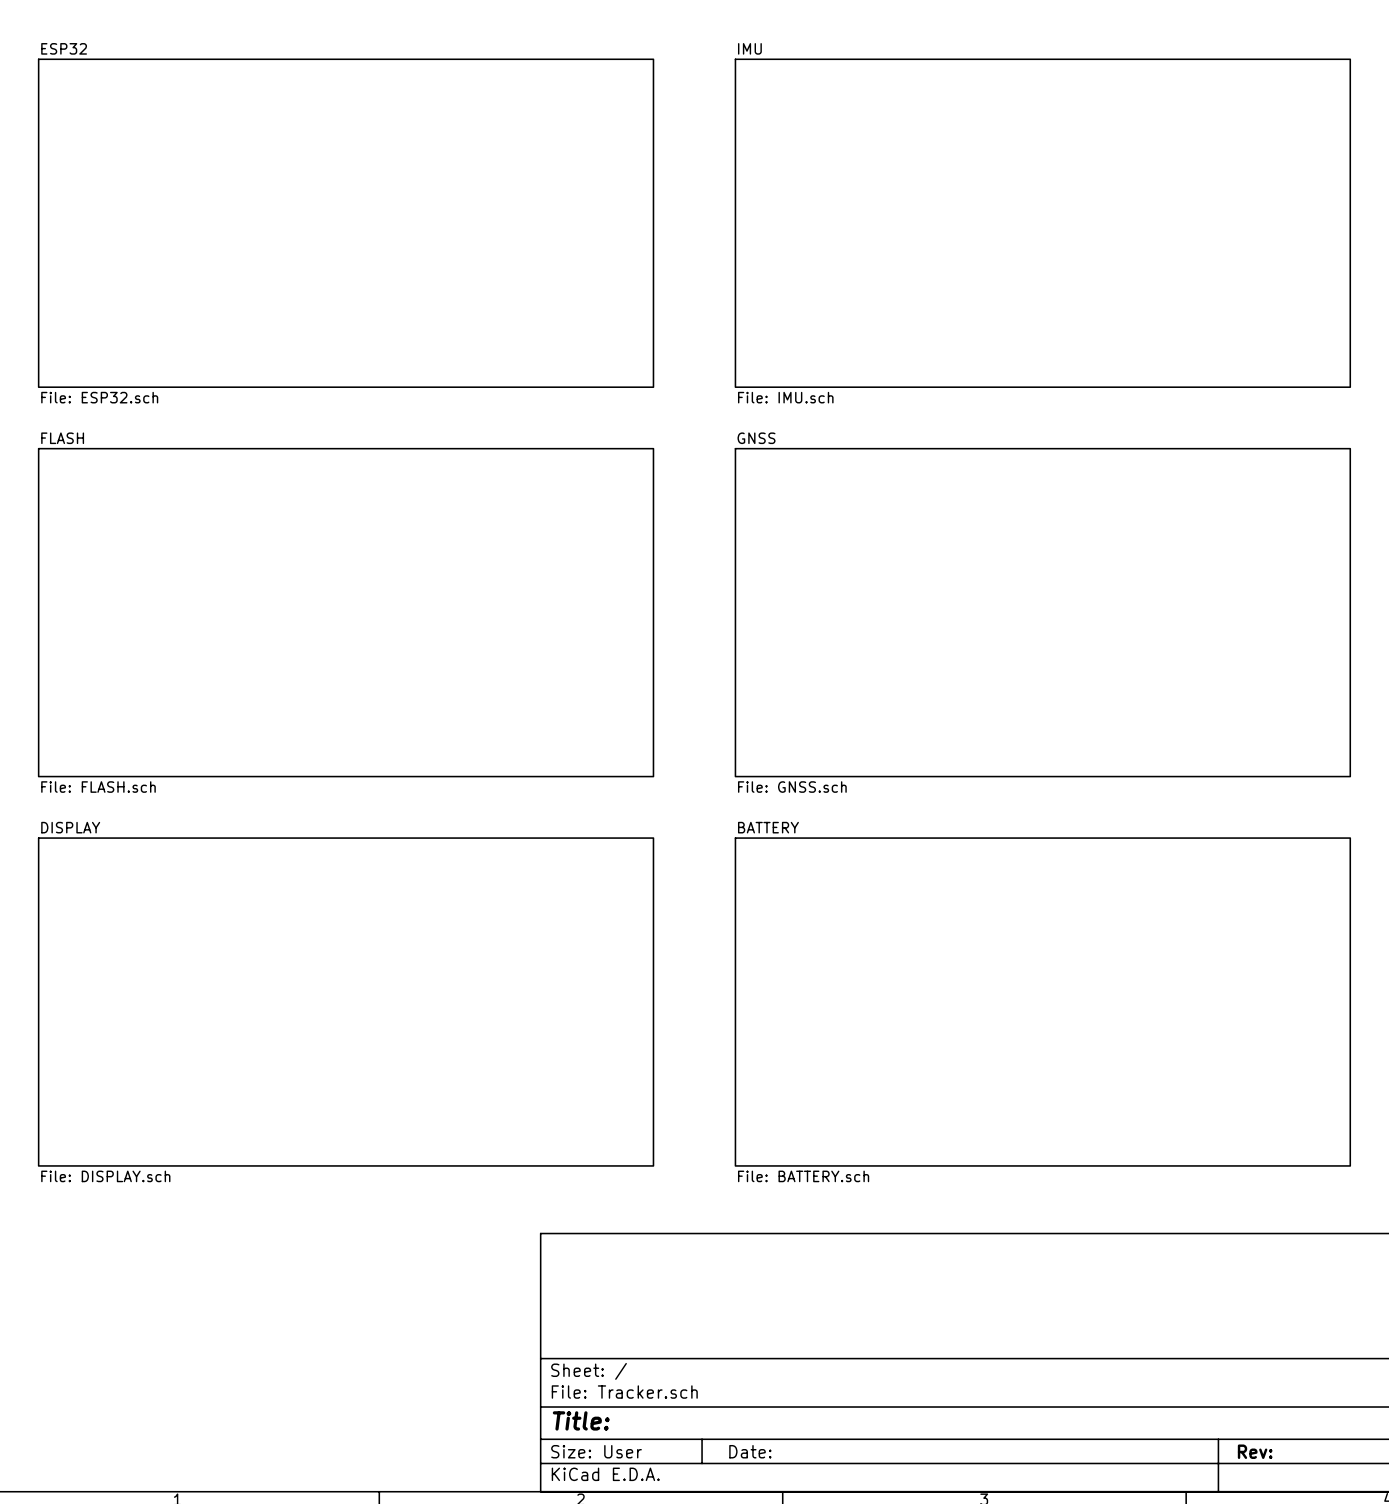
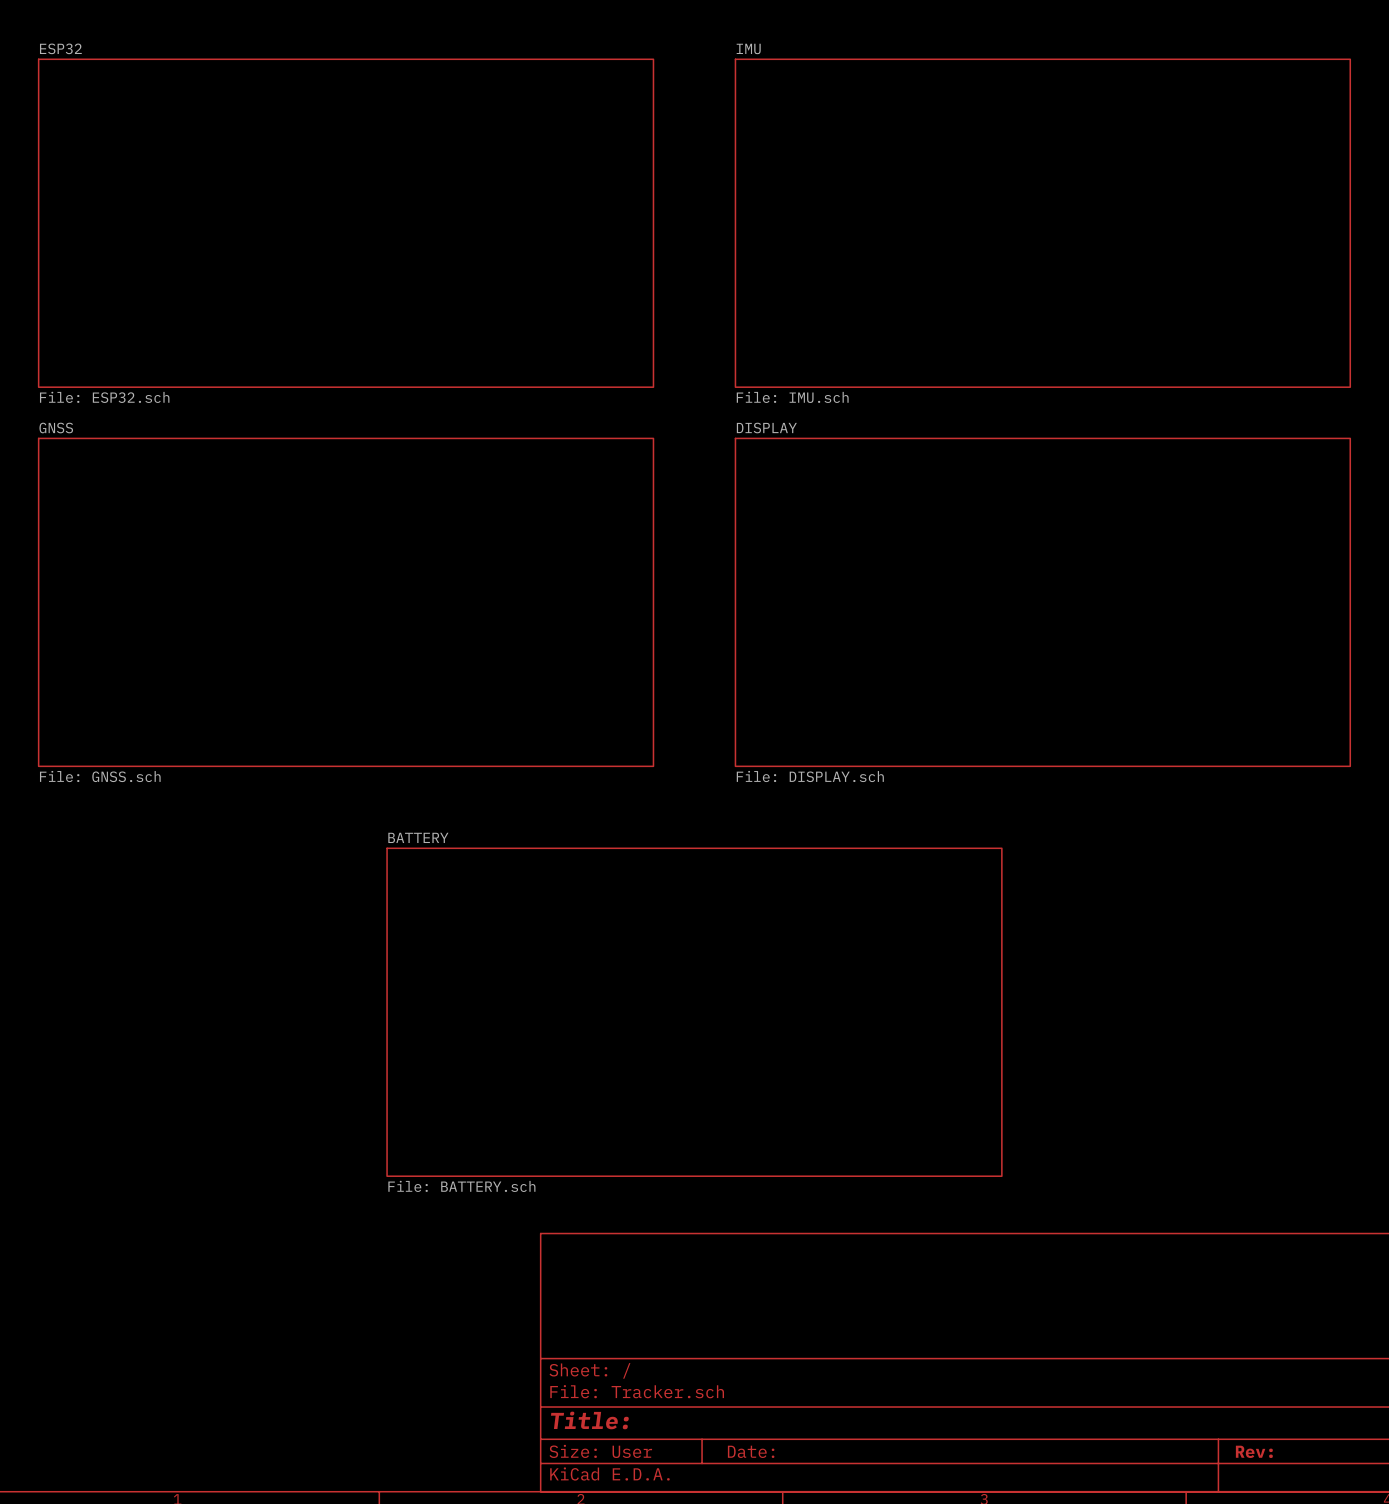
sheet GNSS: none -> File: GNSS.sch (346, 602)
sheet DISPLAY: none -> File: DISPLAY.sch (1042, 602)
sheet FLASH: File: FLASH.sch (346, 612) -> none
sheet GNSS: File: GNSS.sch (1042, 612) -> none
sheet DISPLAY: File: DISPLAY.sch (346, 1002) -> none
sheet BATTERY: File: BATTERY.sch (1042, 1002) -> none
sheet BATTERY: none -> File: BATTERY.sch (694, 1012)

